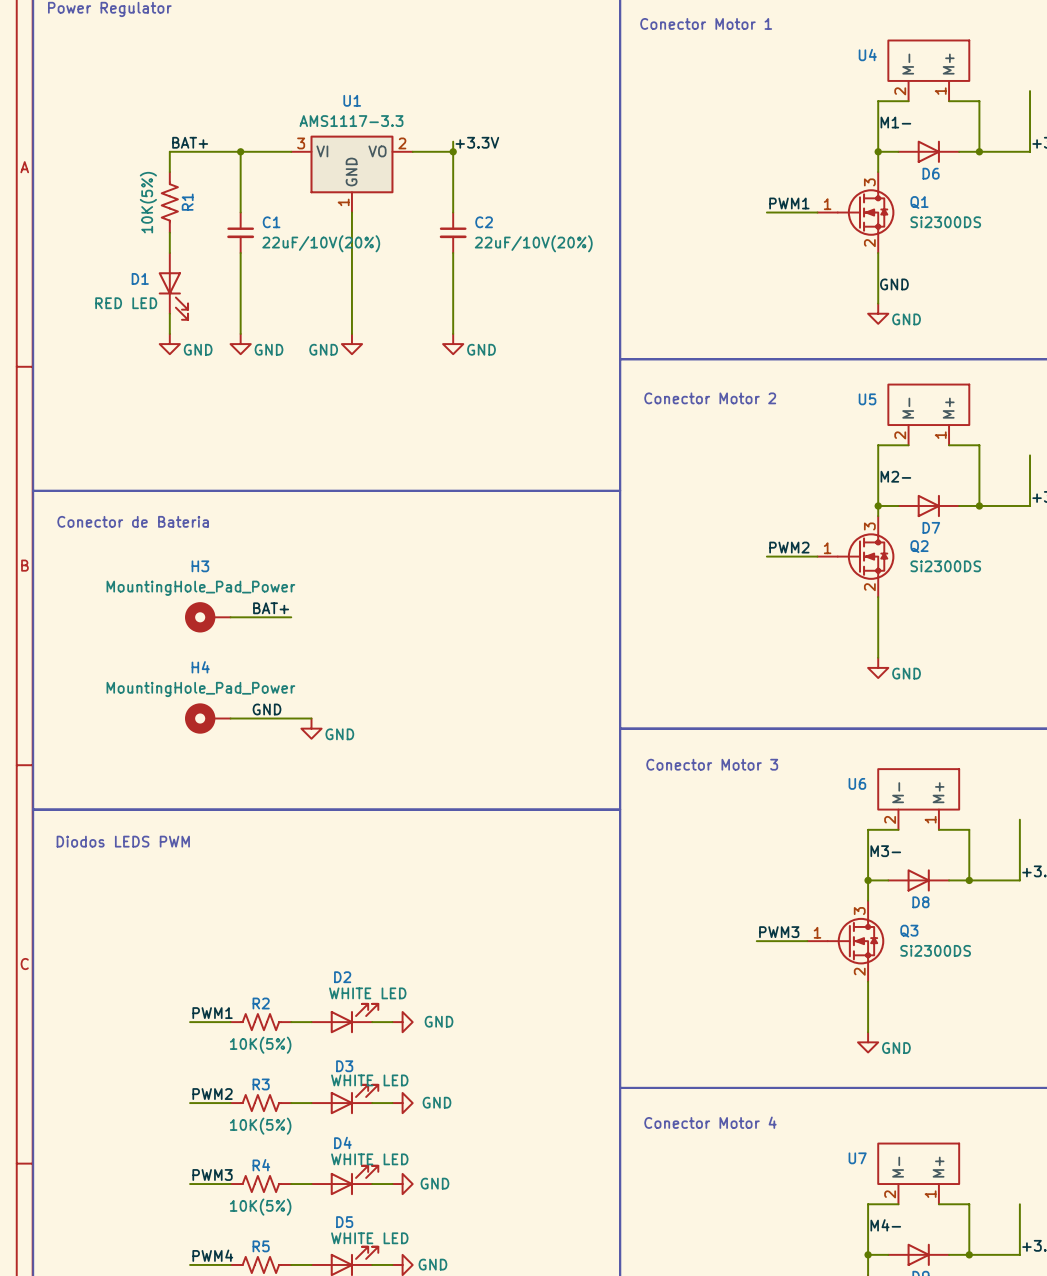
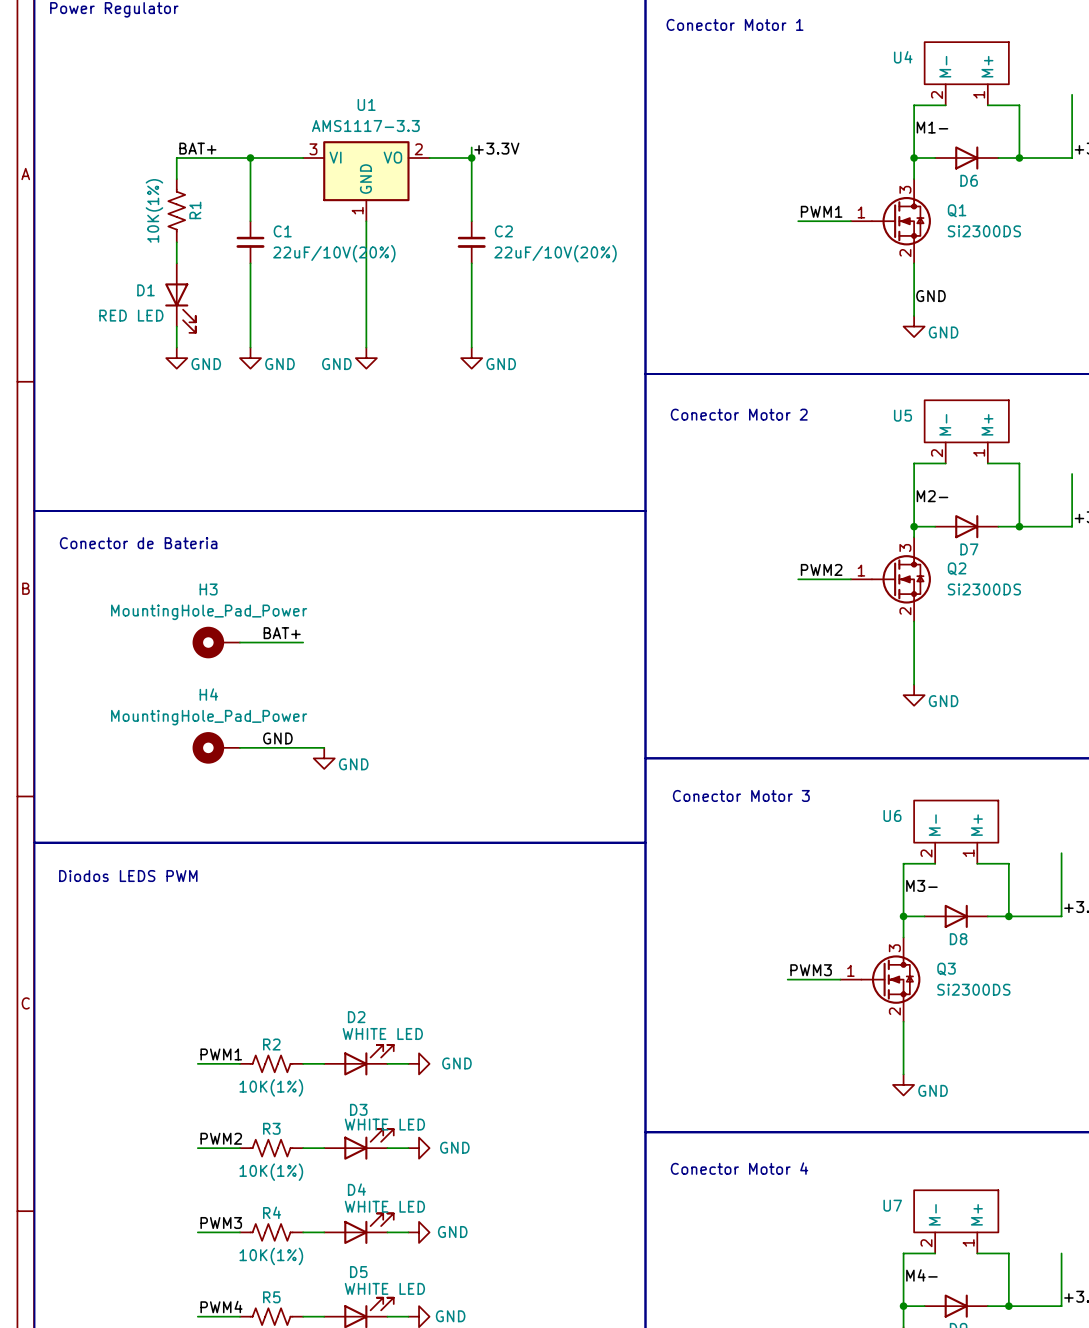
R1 value: 10K(5%) (148, 202) -> 10K(1%) (154, 210)
R2 value: 10K(5%) (260, 1045) -> 10K(1%) (271, 1087)
R3 value: 10K(5%) (260, 1126) -> 10K(1%) (271, 1172)
R4 value: 10K(5%) (260, 1207) -> 10K(1%) (271, 1256)

